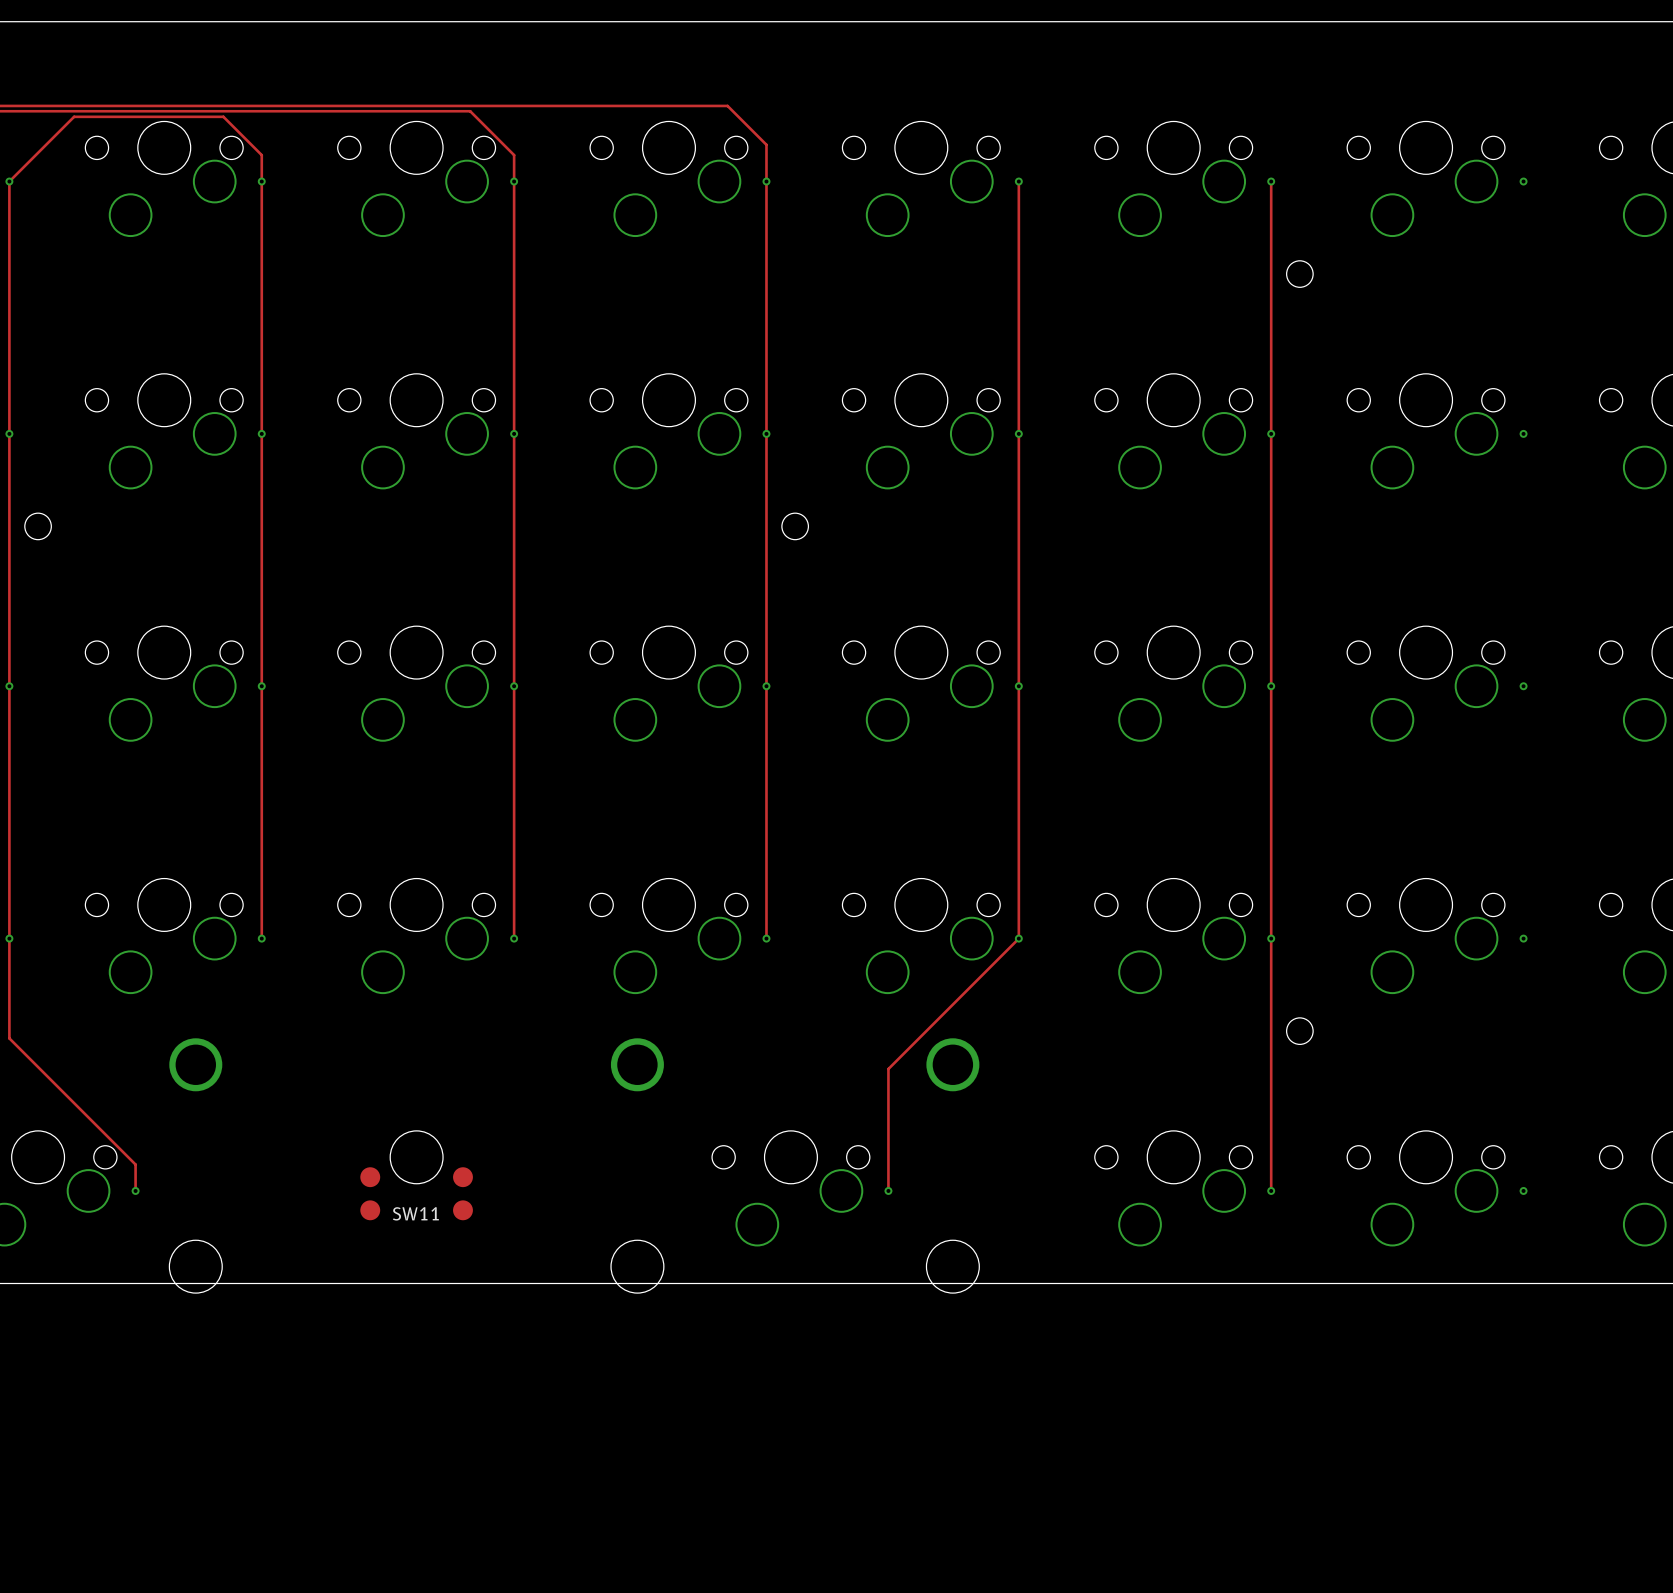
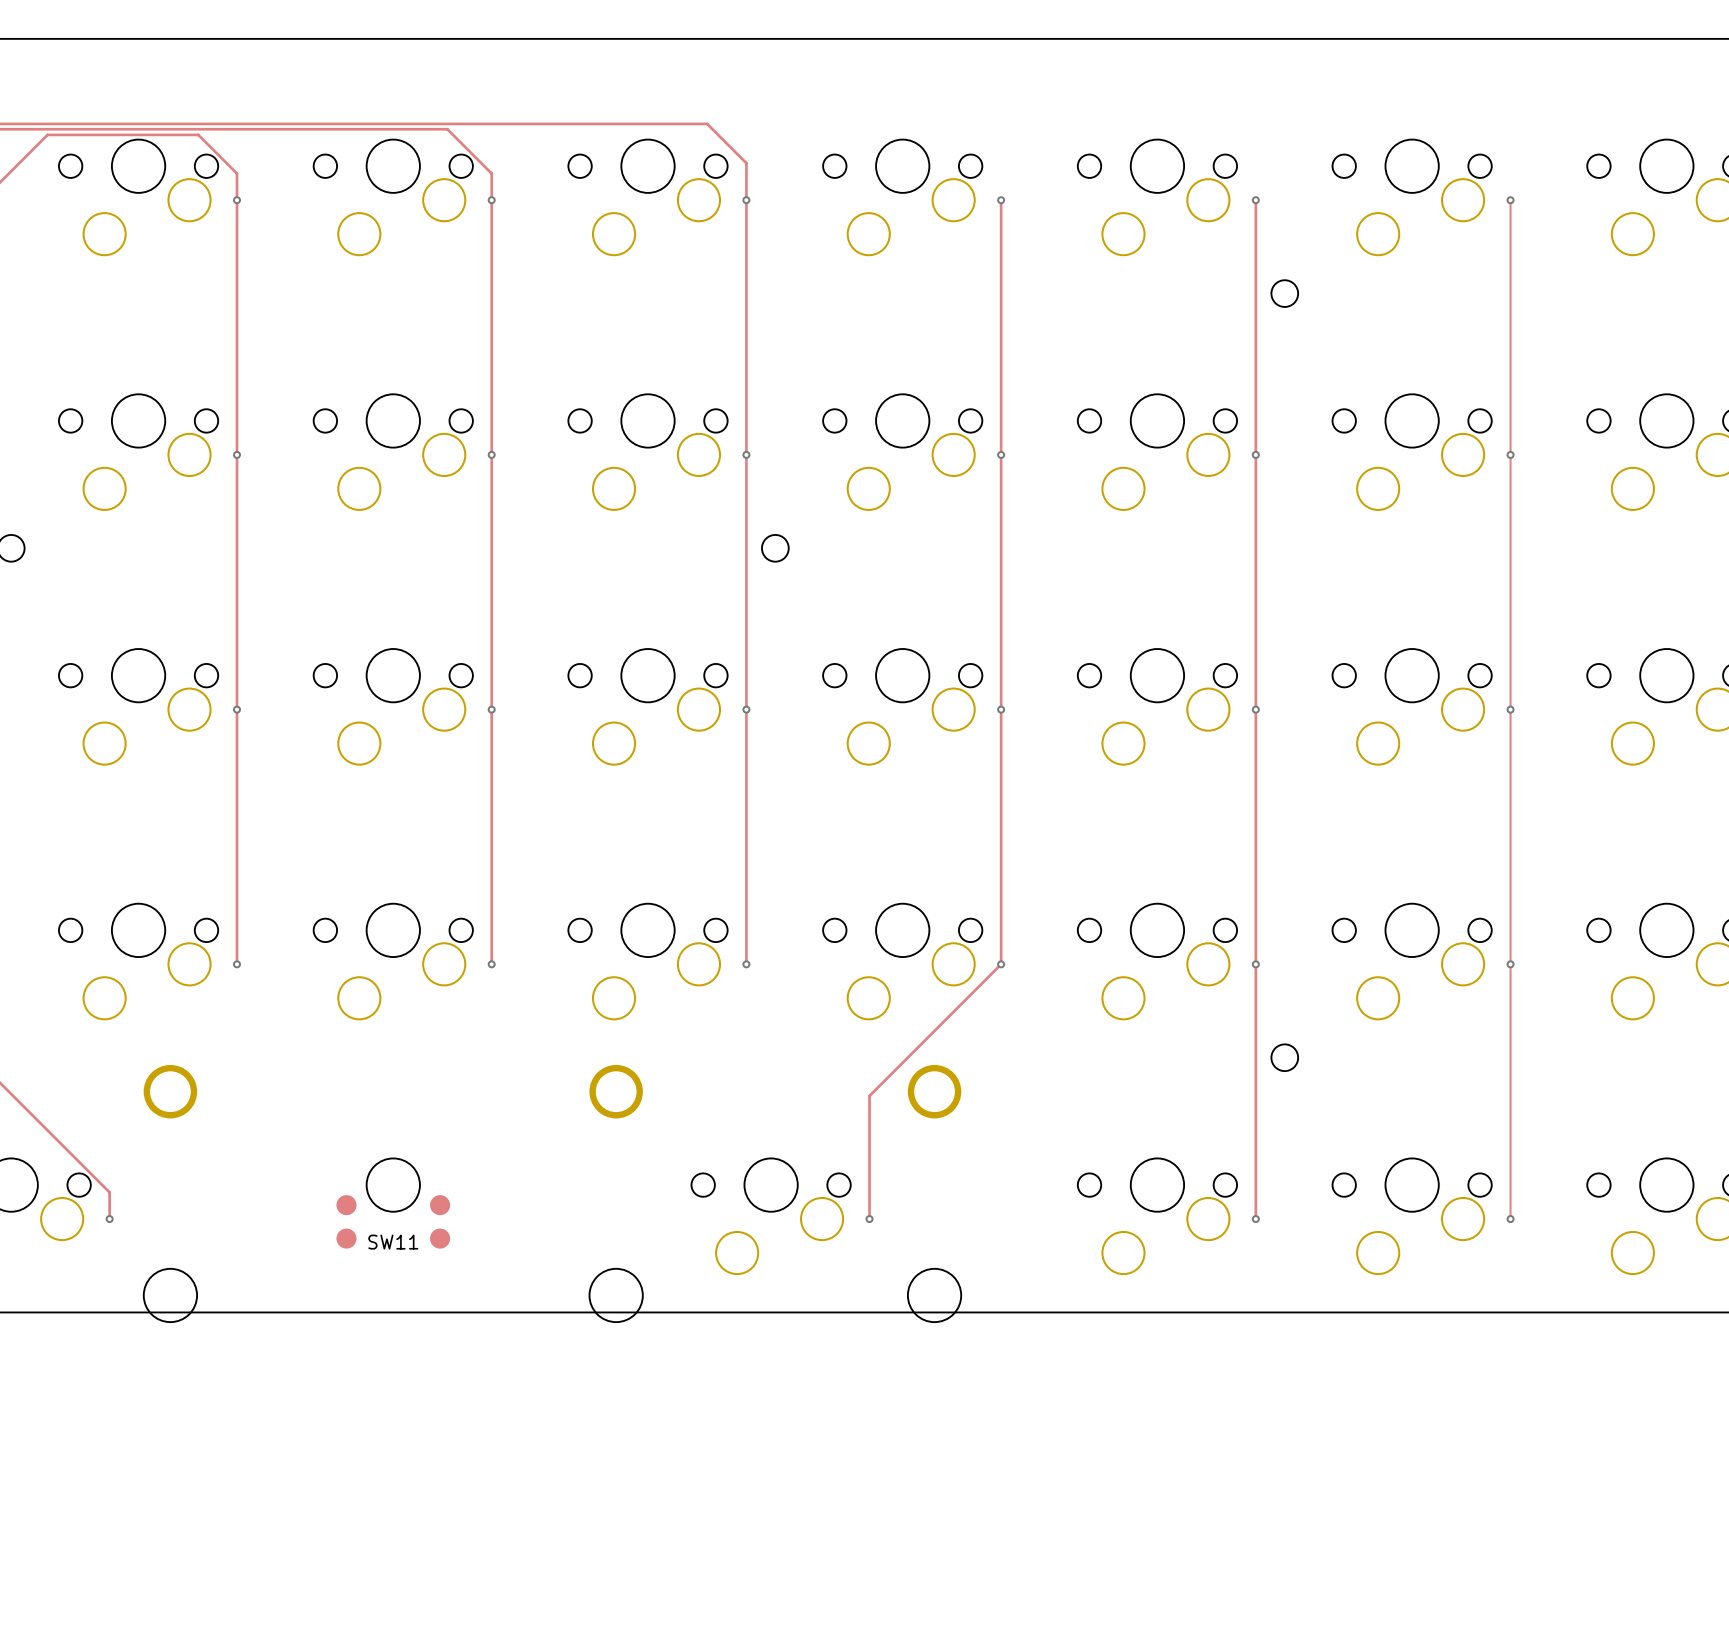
track: none -> (1510, 200) (1510, 1219)

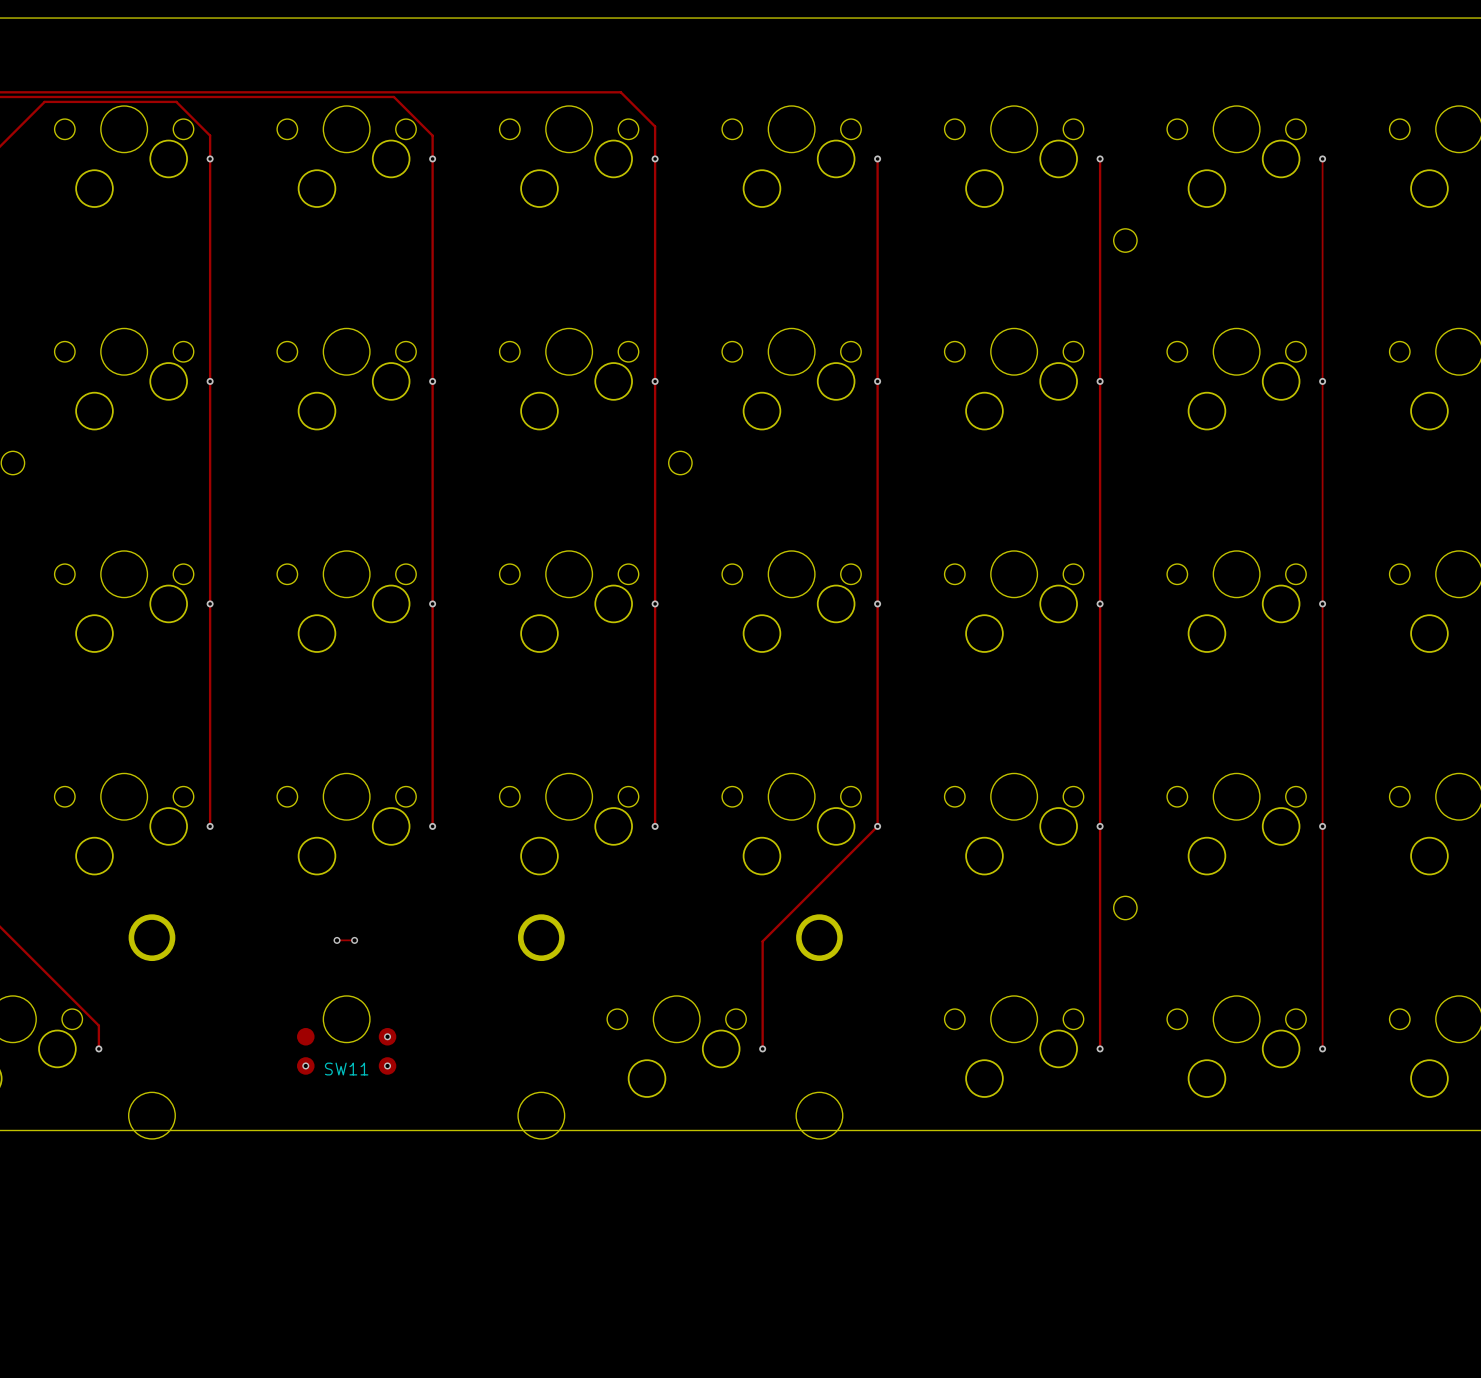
track: none -> (337, 940) (354, 940)
via: none -> (337, 940)
via: none -> (354, 940)
via: none -> (387, 1036)
via: none -> (305, 1065)
via: none -> (387, 1065)

